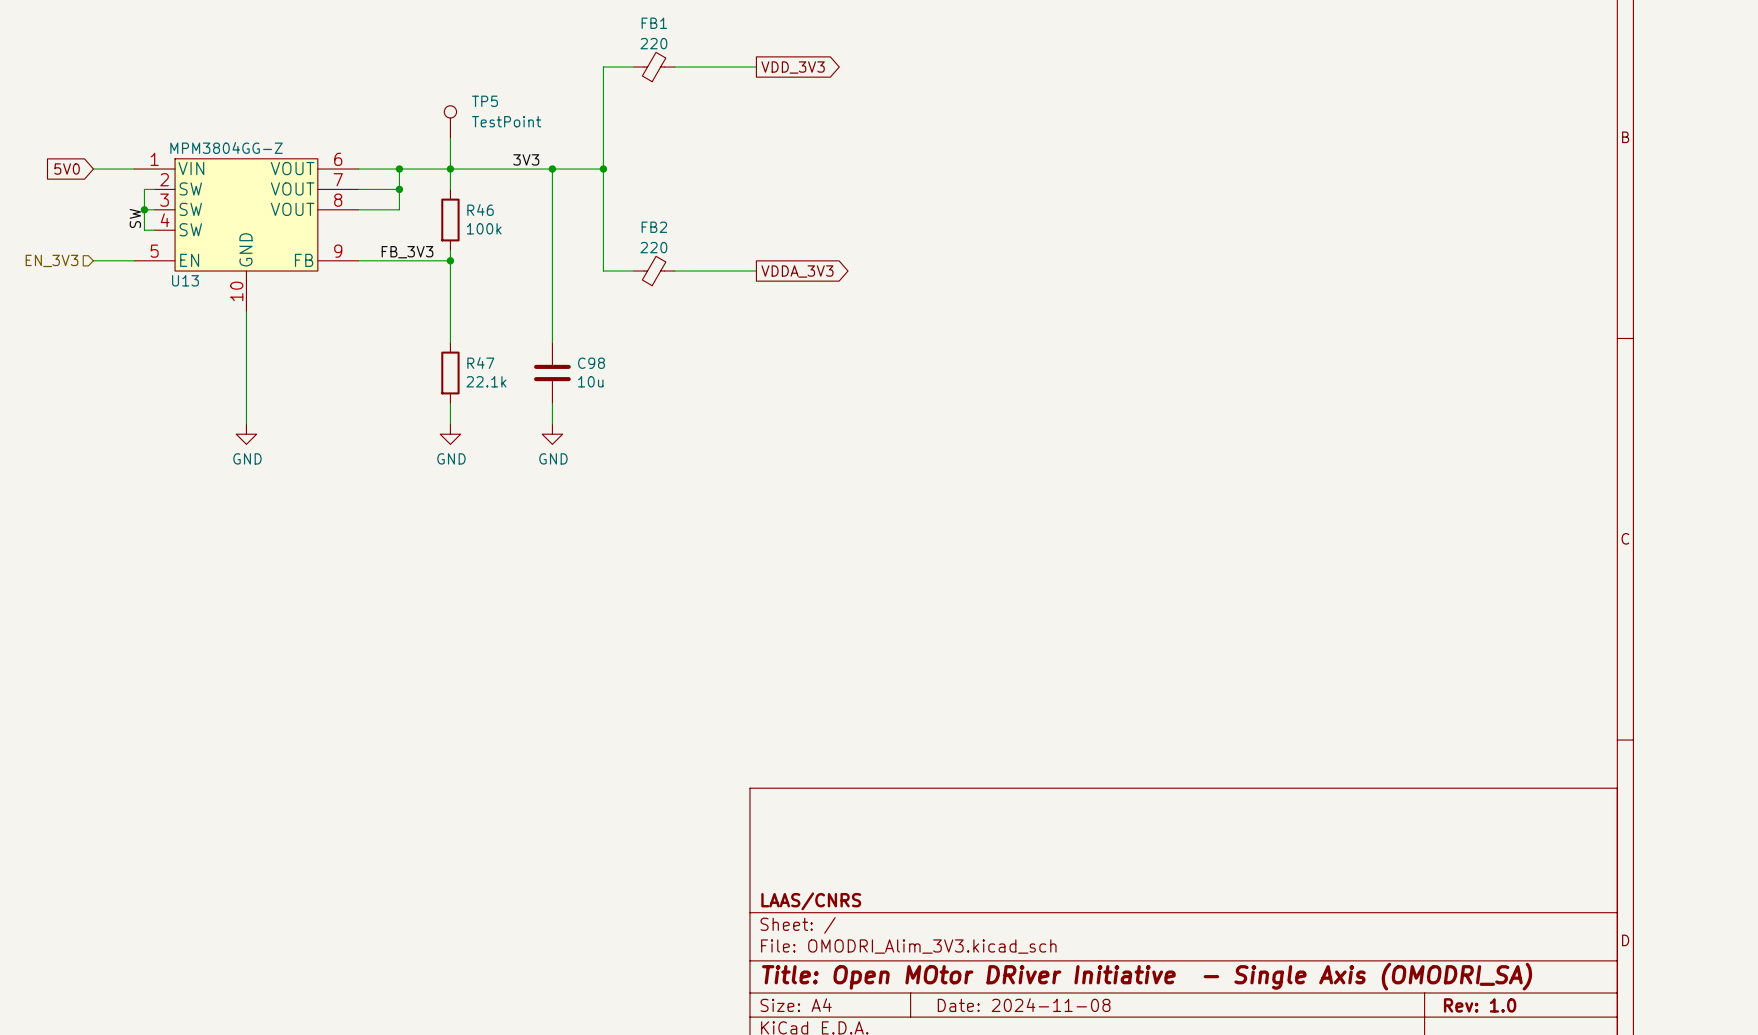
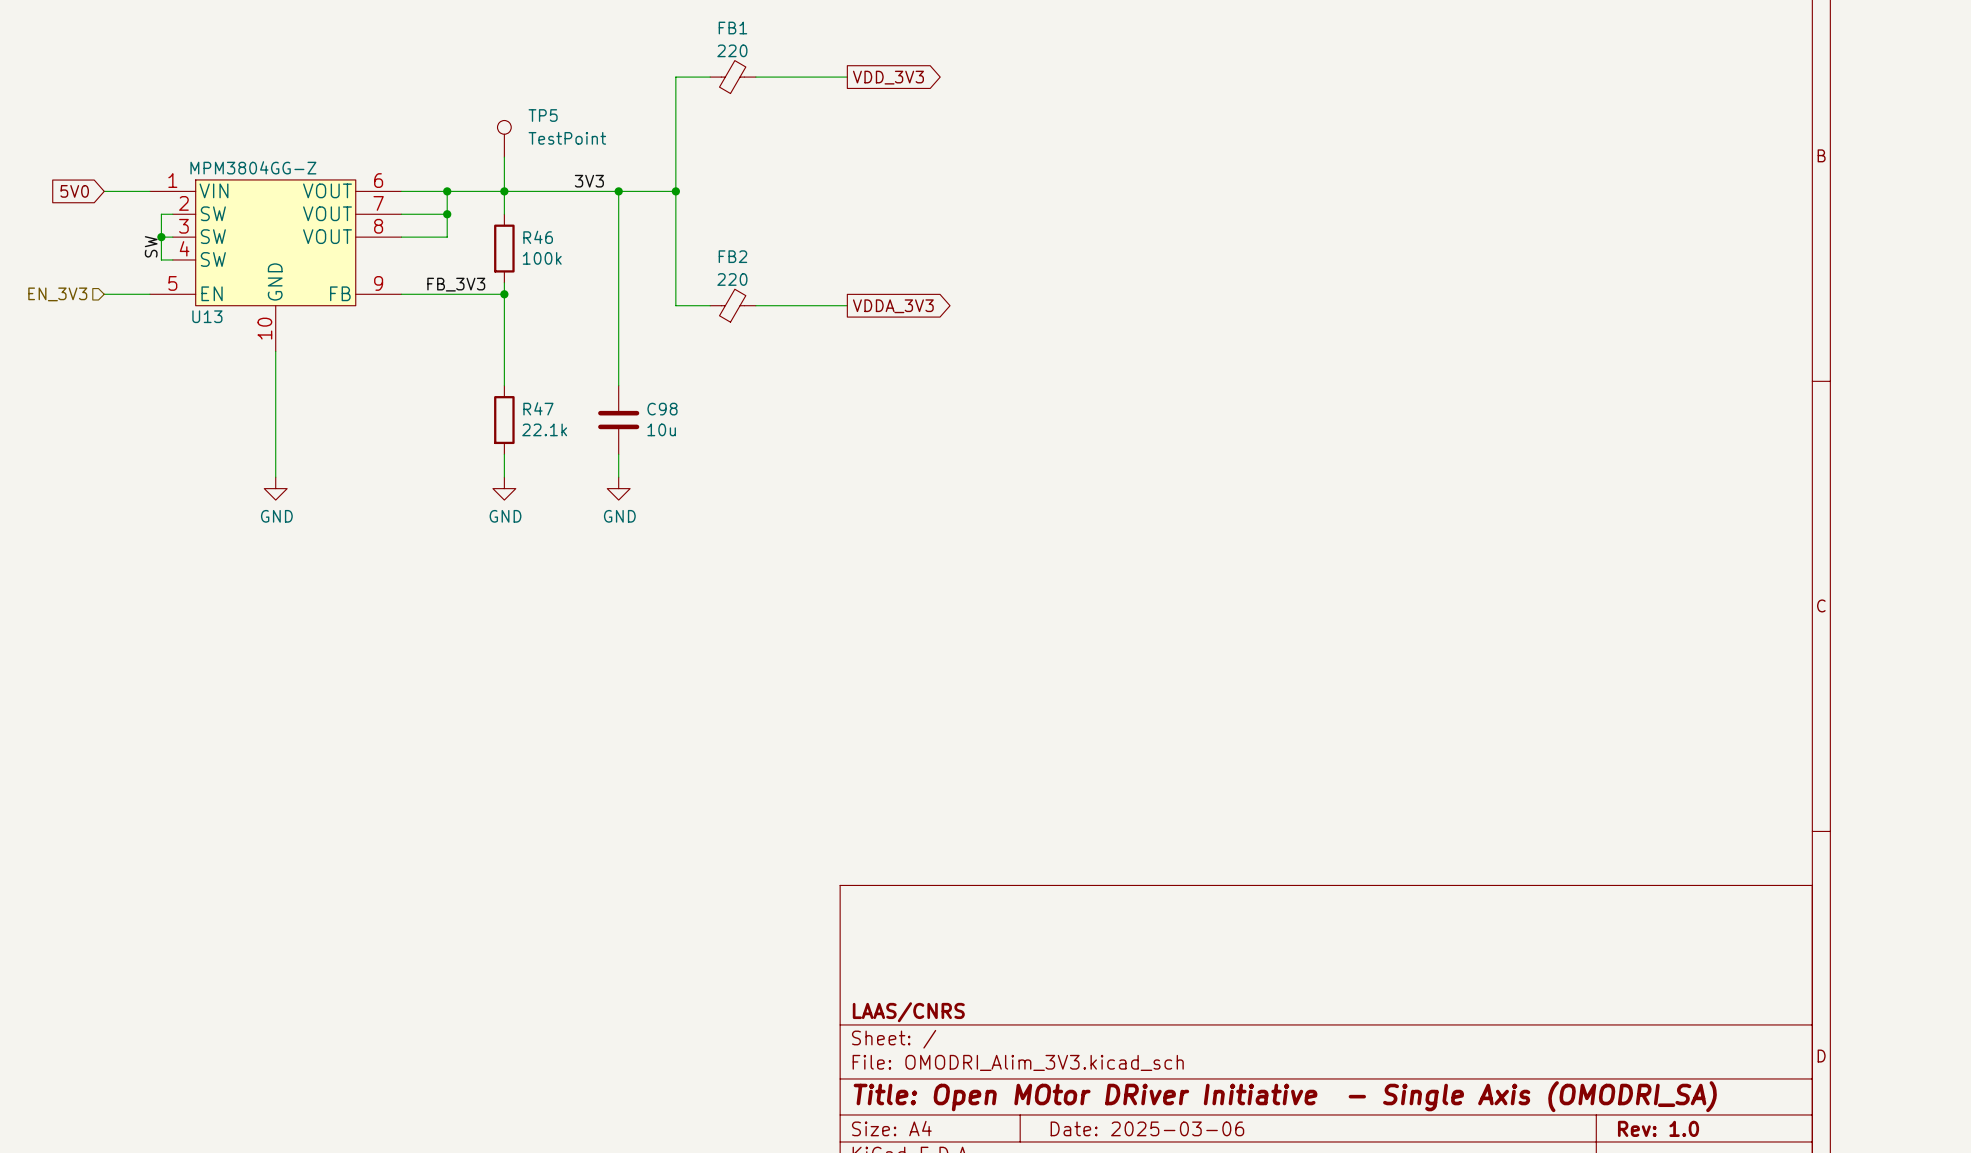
title block: Date: 2024-11-08 (1024, 1005) -> Date: 2025-03-06 (1147, 1128)

